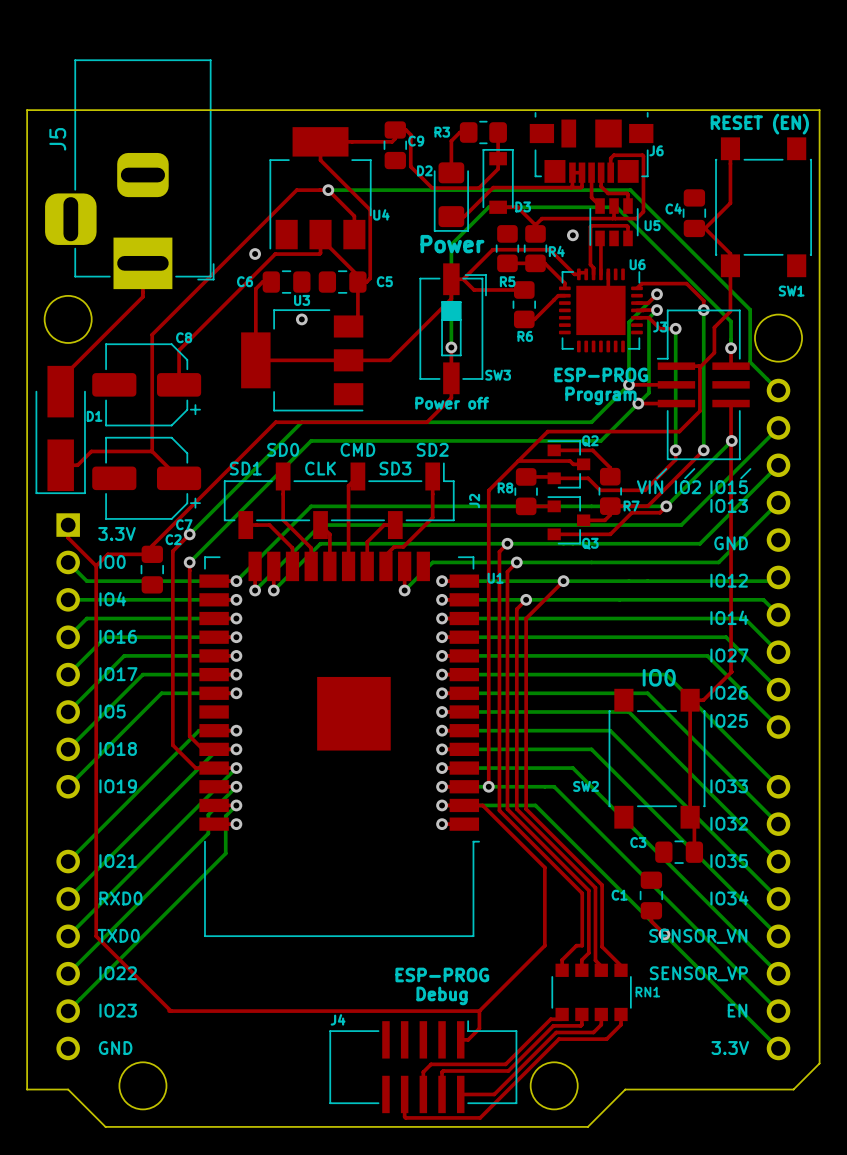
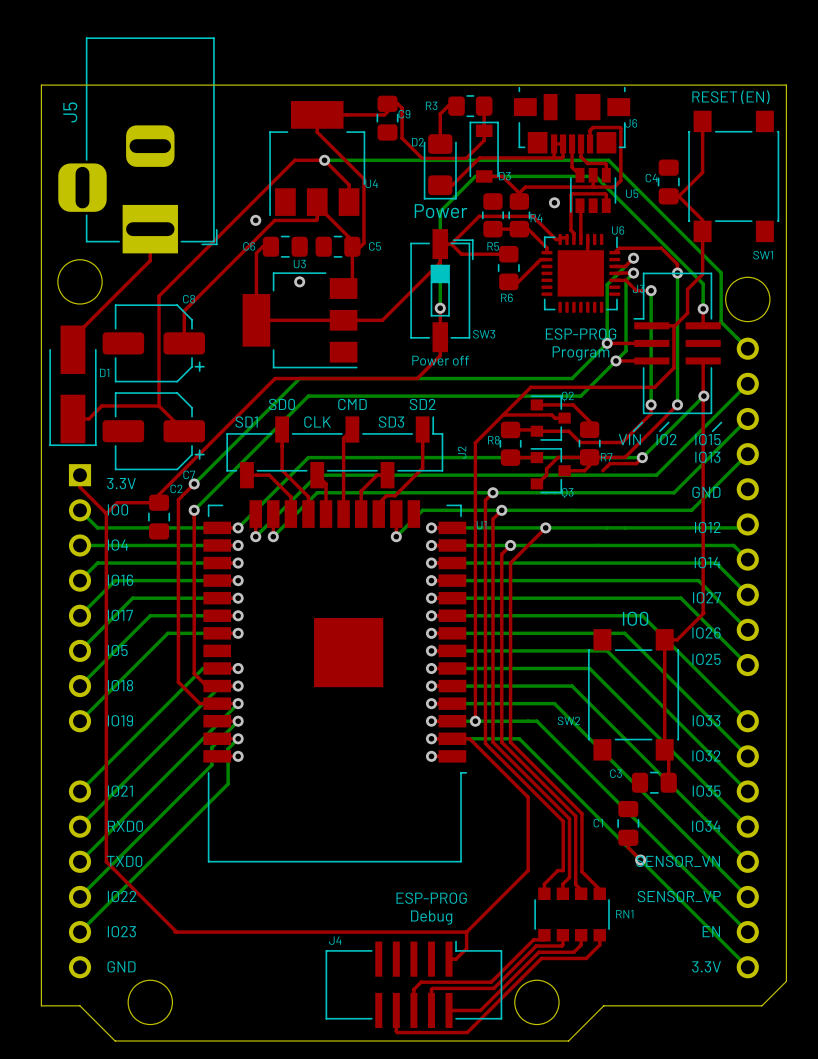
top track: (624, 520) (610, 534) (554, 534) -> (589, 457) (558, 457) (546, 468) (546, 474) (537, 483)

